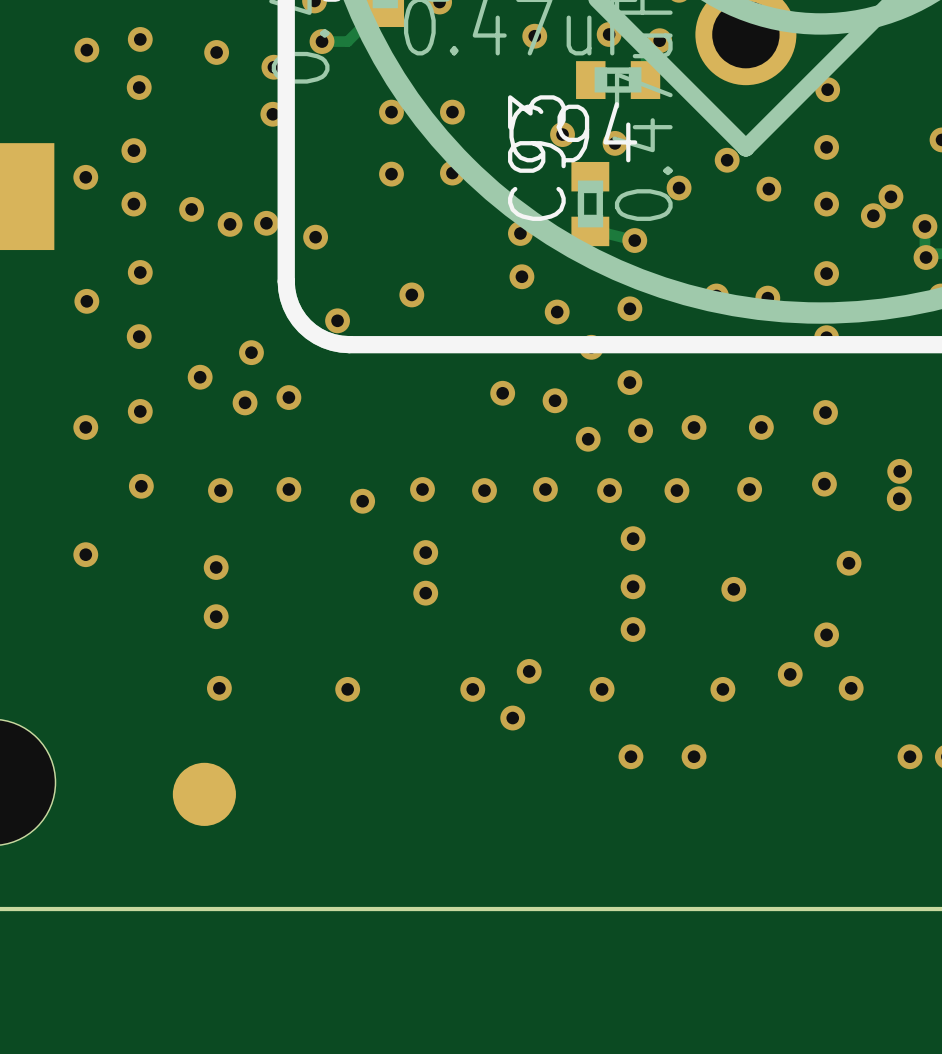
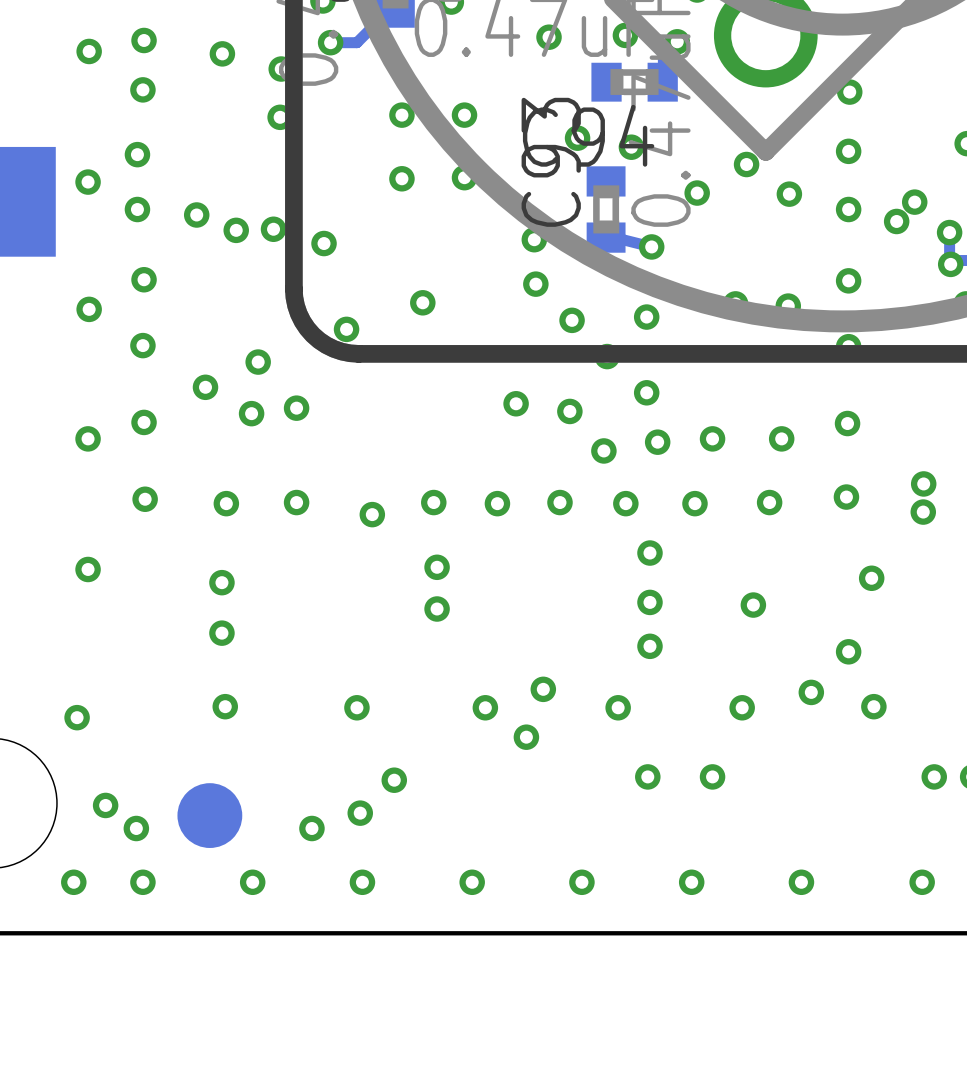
via: none -> (77, 717)
via: none -> (394, 780)
via: none -> (105, 805)
via: none -> (360, 813)
via: none -> (136, 828)
via: none -> (311, 828)
via: none -> (73, 882)
via: none -> (142, 882)
via: none -> (252, 882)
via: none -> (362, 882)
via: none -> (472, 882)
via: none -> (581, 882)
via: none -> (691, 882)
via: none -> (801, 882)
via: none -> (922, 882)

